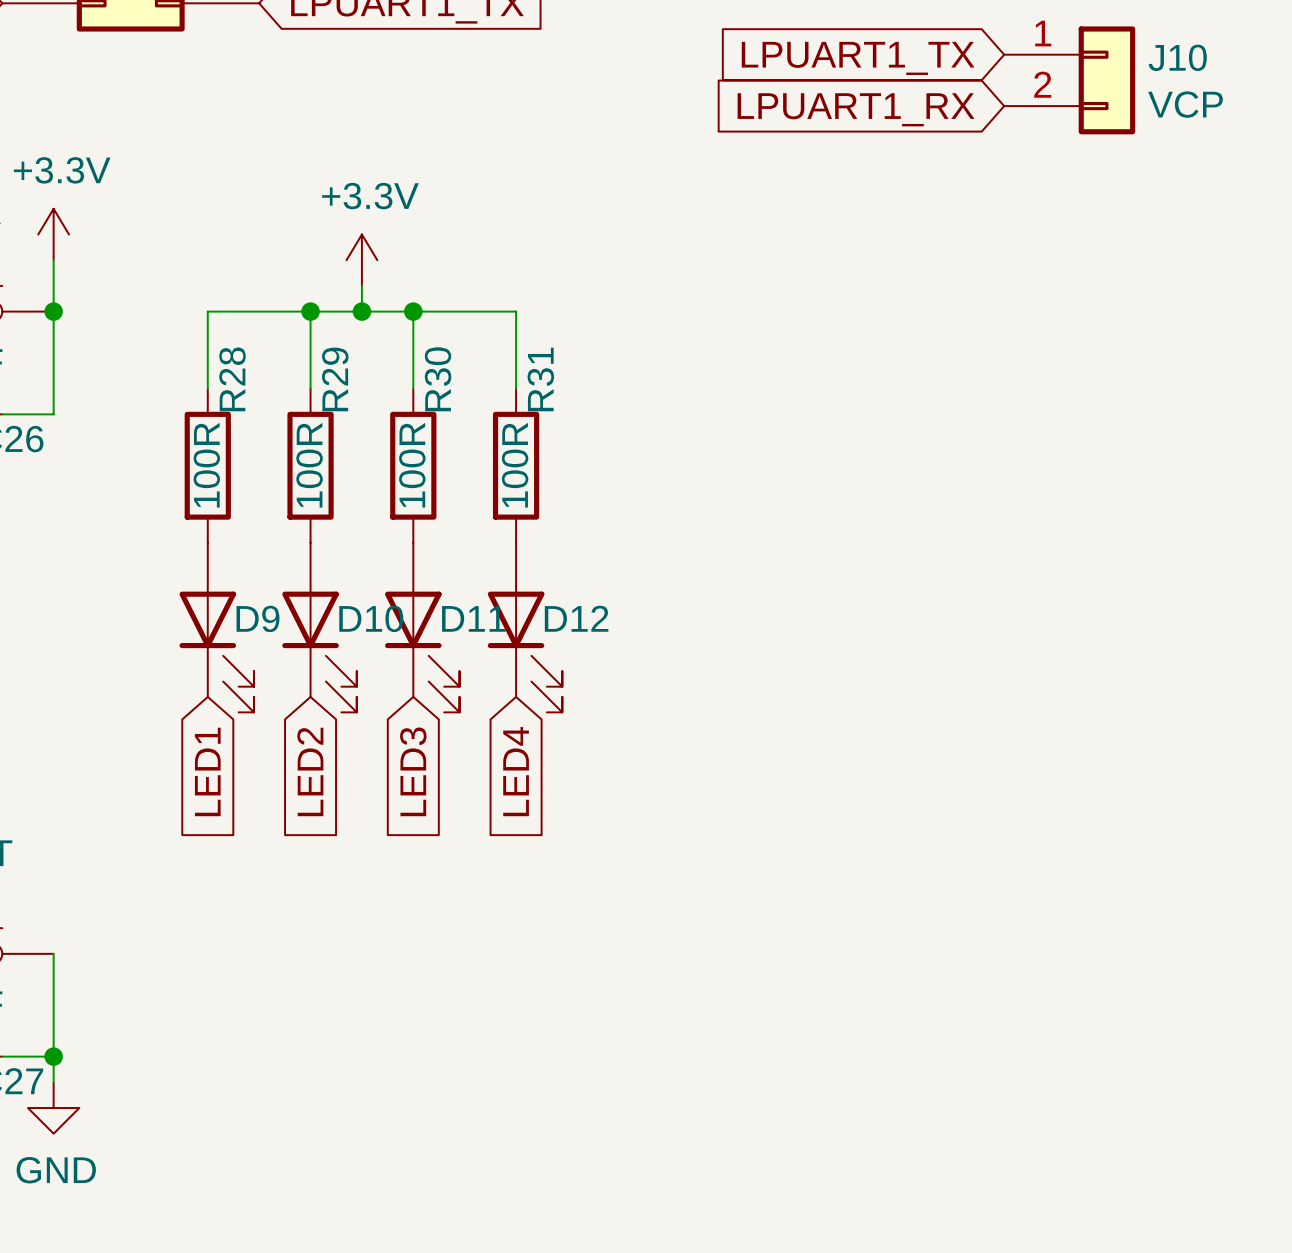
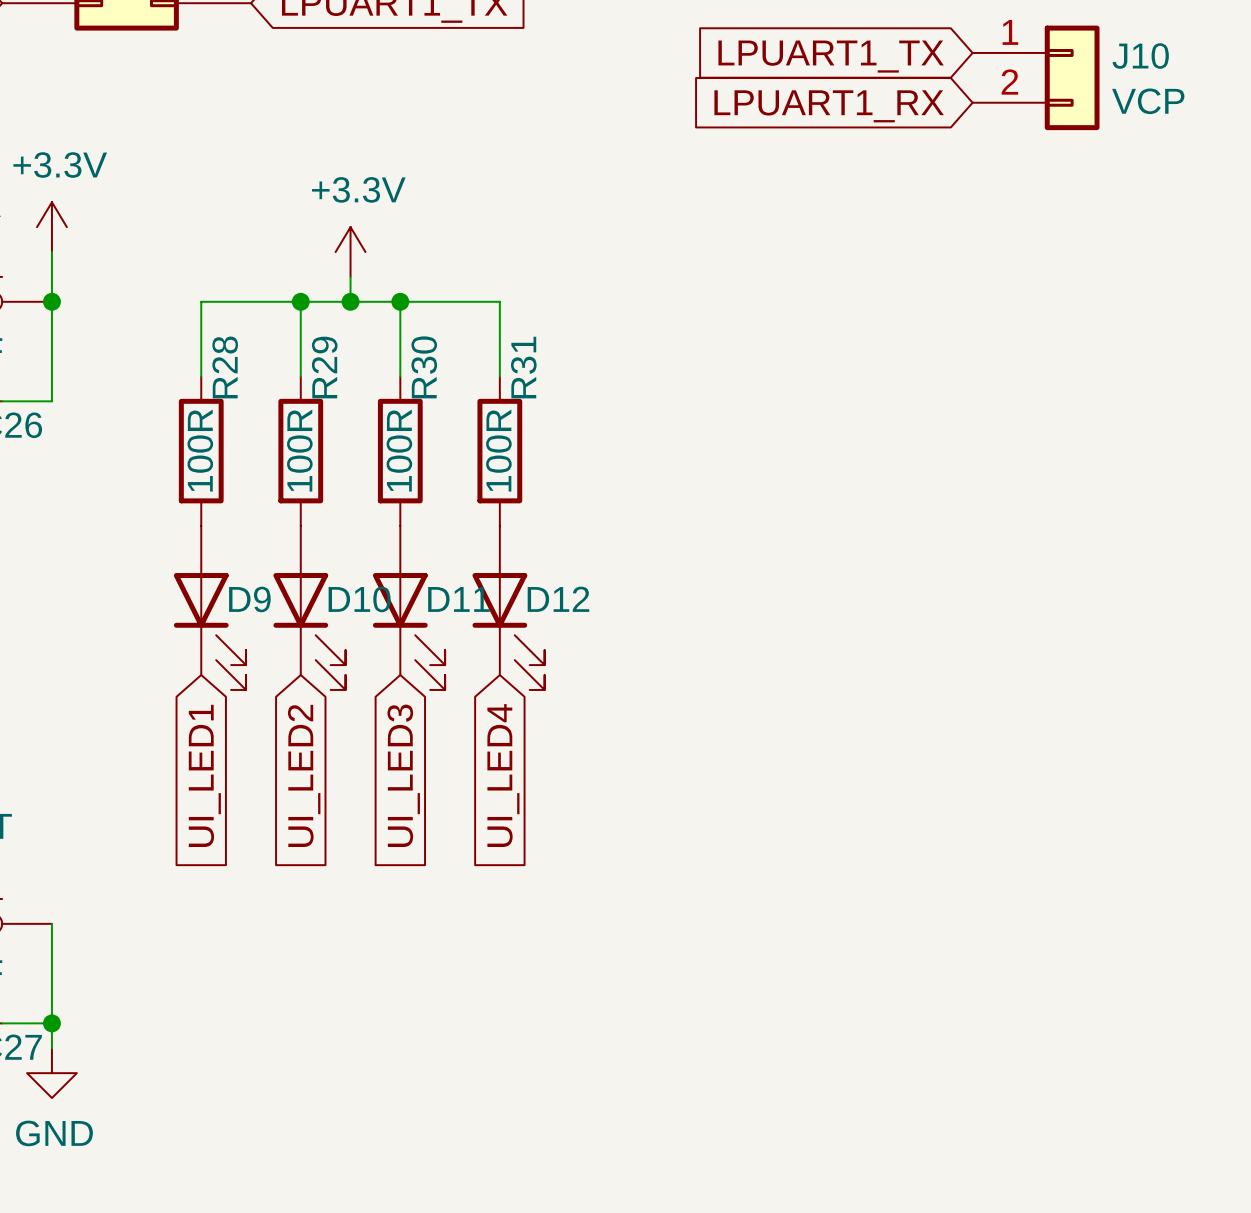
global label: LED1 (207, 771) -> UI_LED1 (204, 775)
global label: LED2 (310, 771) -> UI_LED2 (304, 775)
global label: LED3 (413, 771) -> UI_LED3 (403, 775)
global label: LED4 (516, 771) -> UI_LED4 (503, 775)

